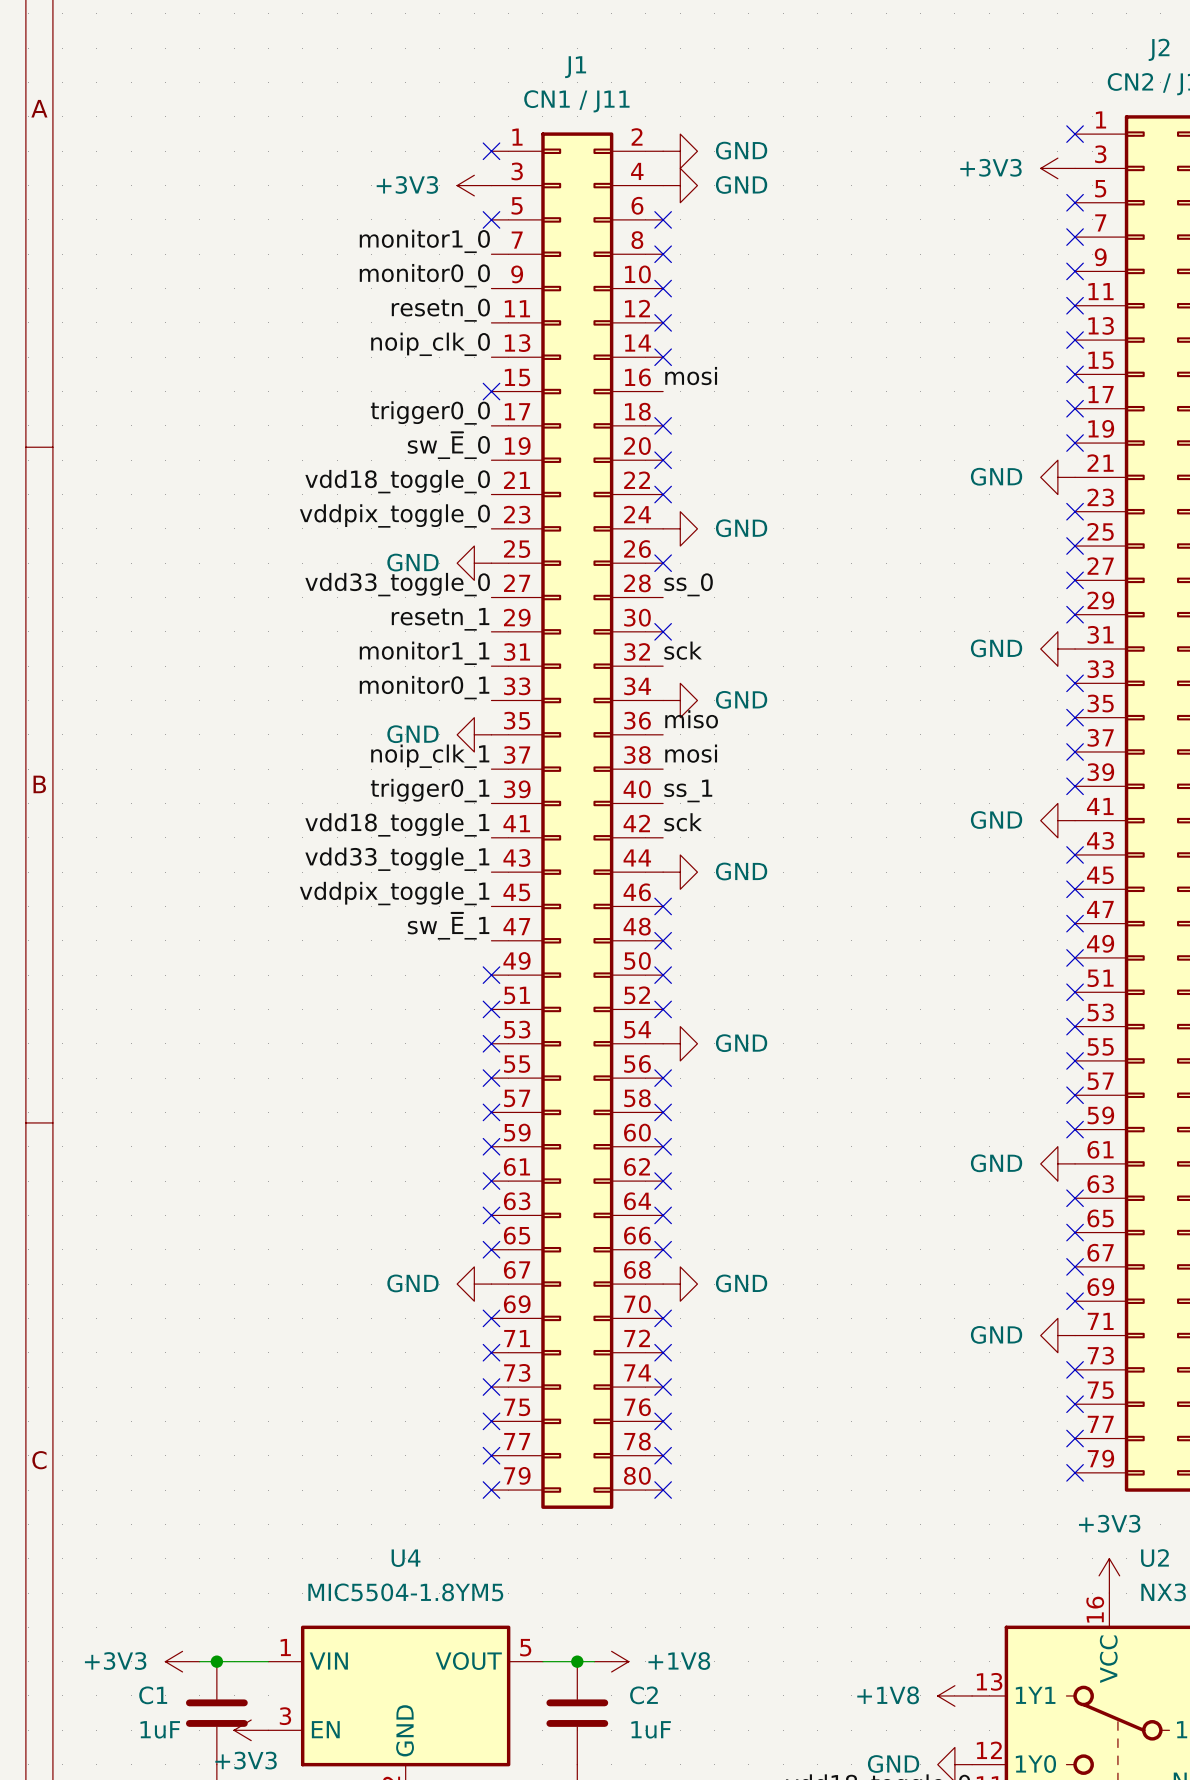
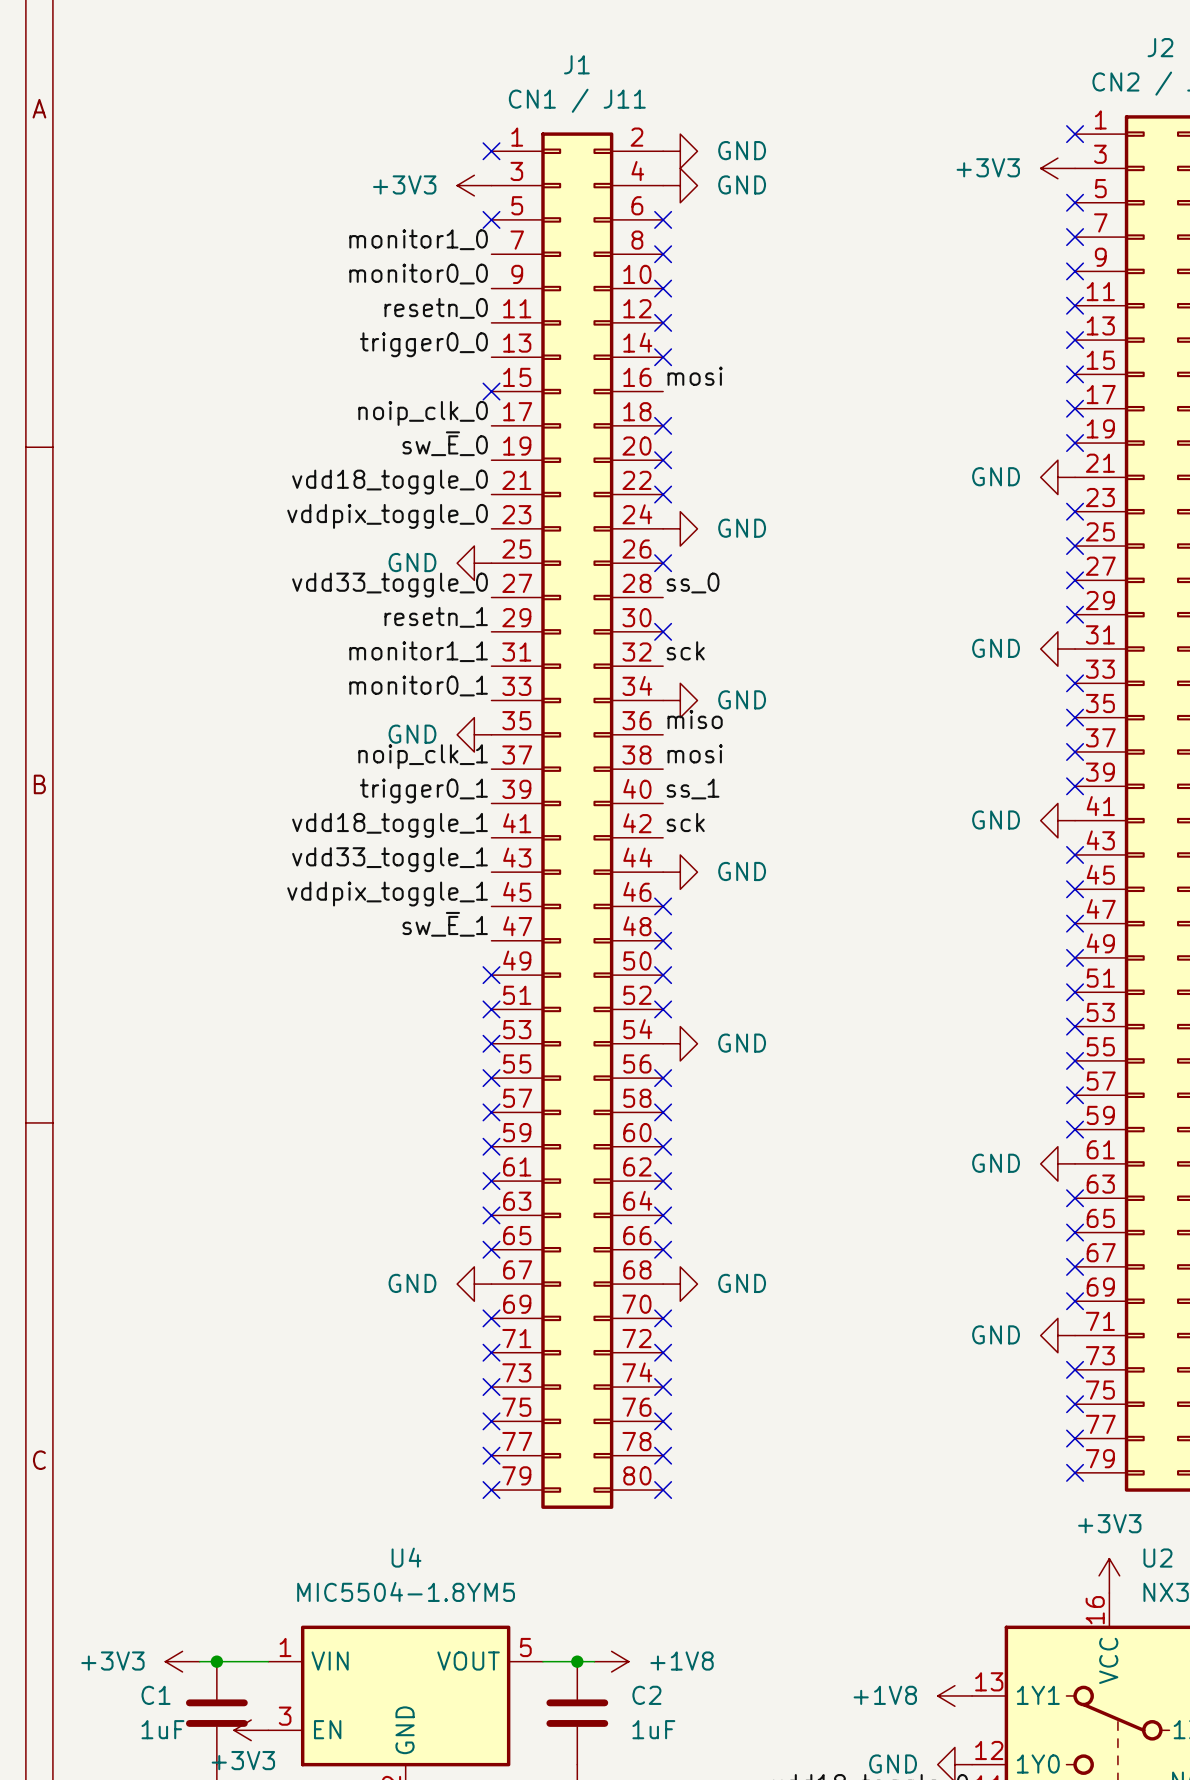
label: noip_clk_0 (430, 344) -> trigger0_0 (423, 344)
label: trigger0_0 (430, 412) -> noip_clk_0 (423, 413)

